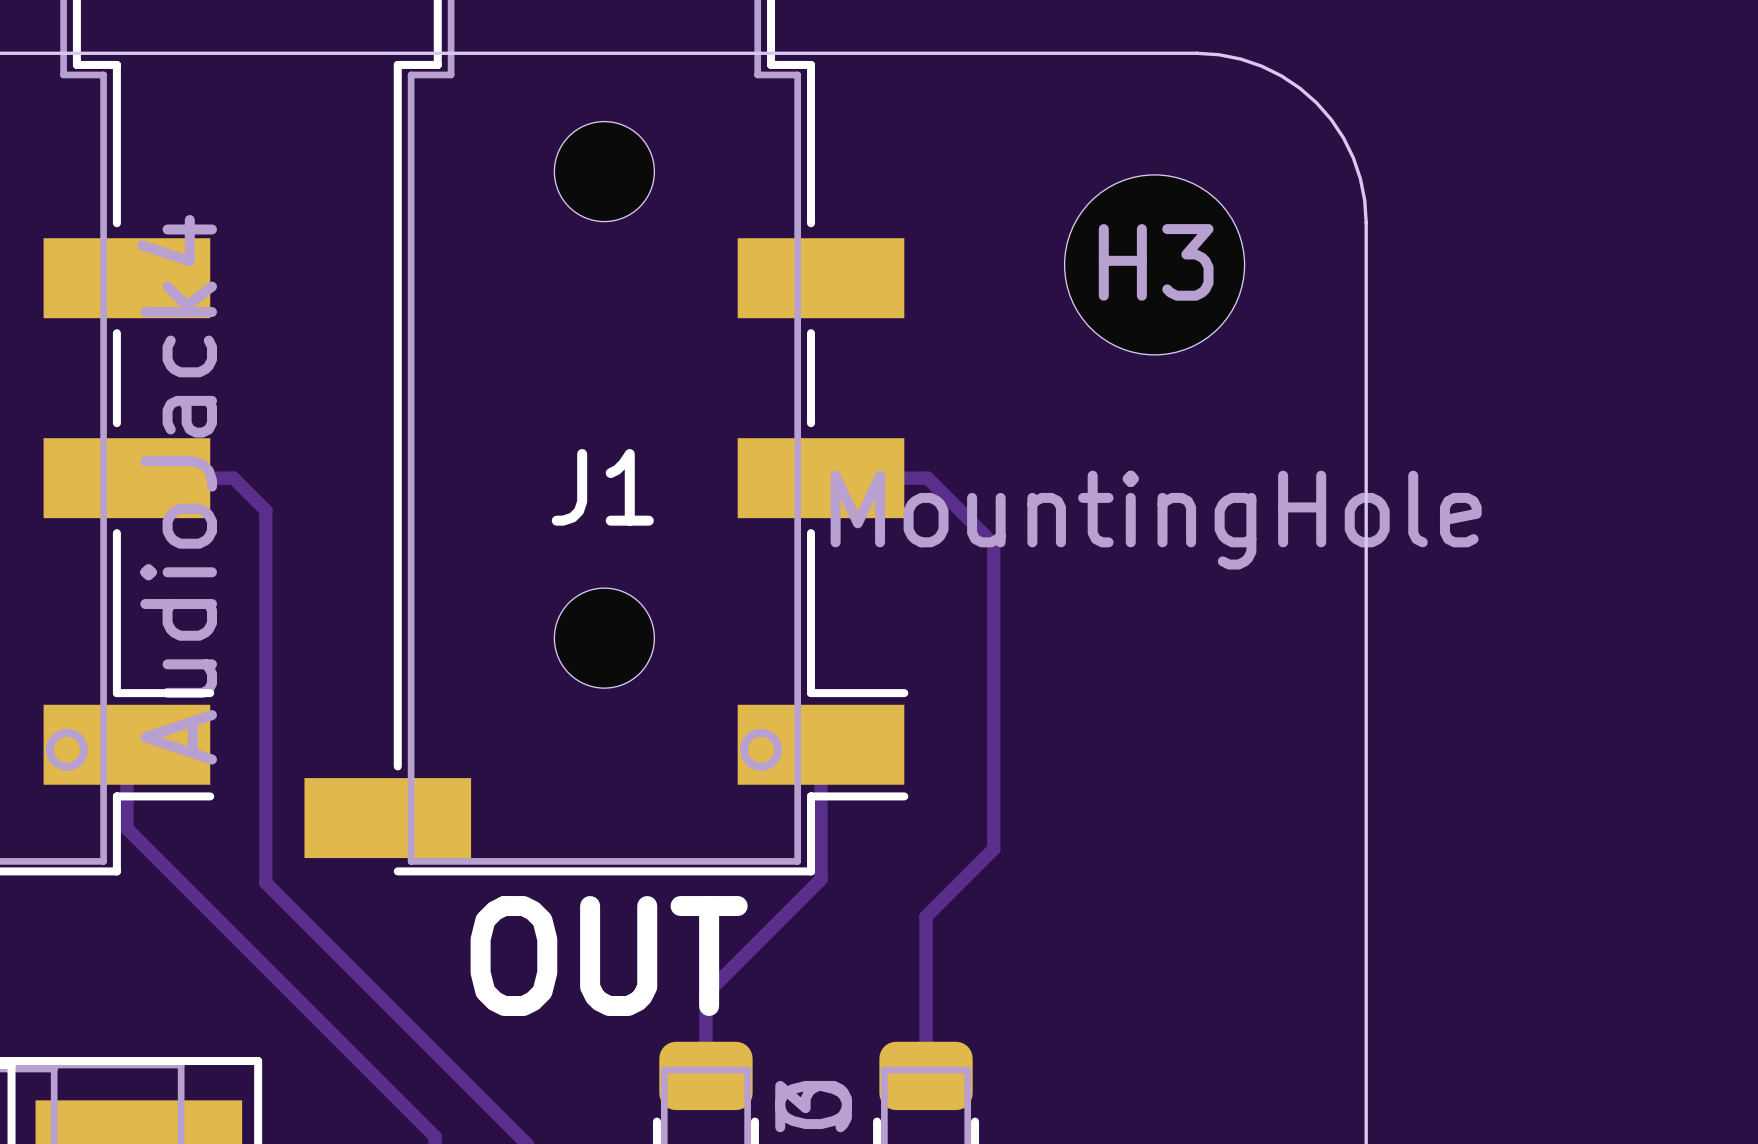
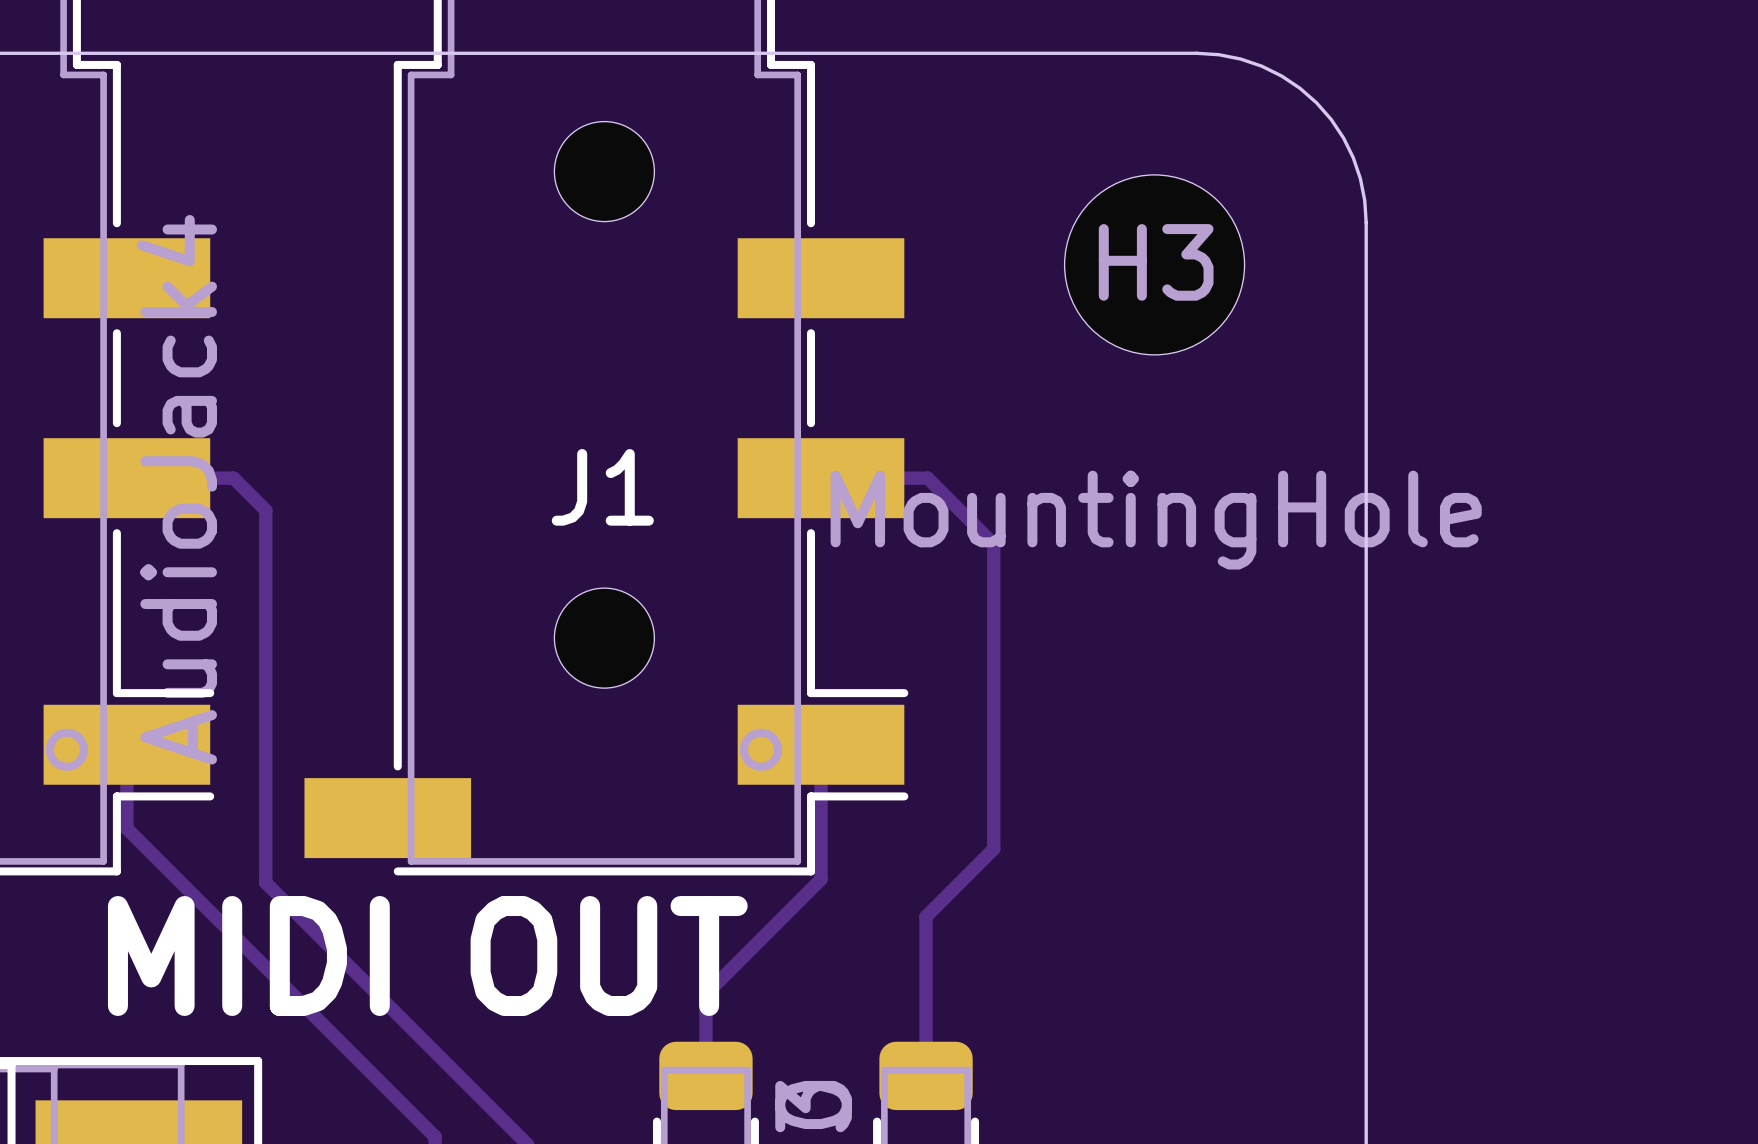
text: none -> MIDI (248, 956)

